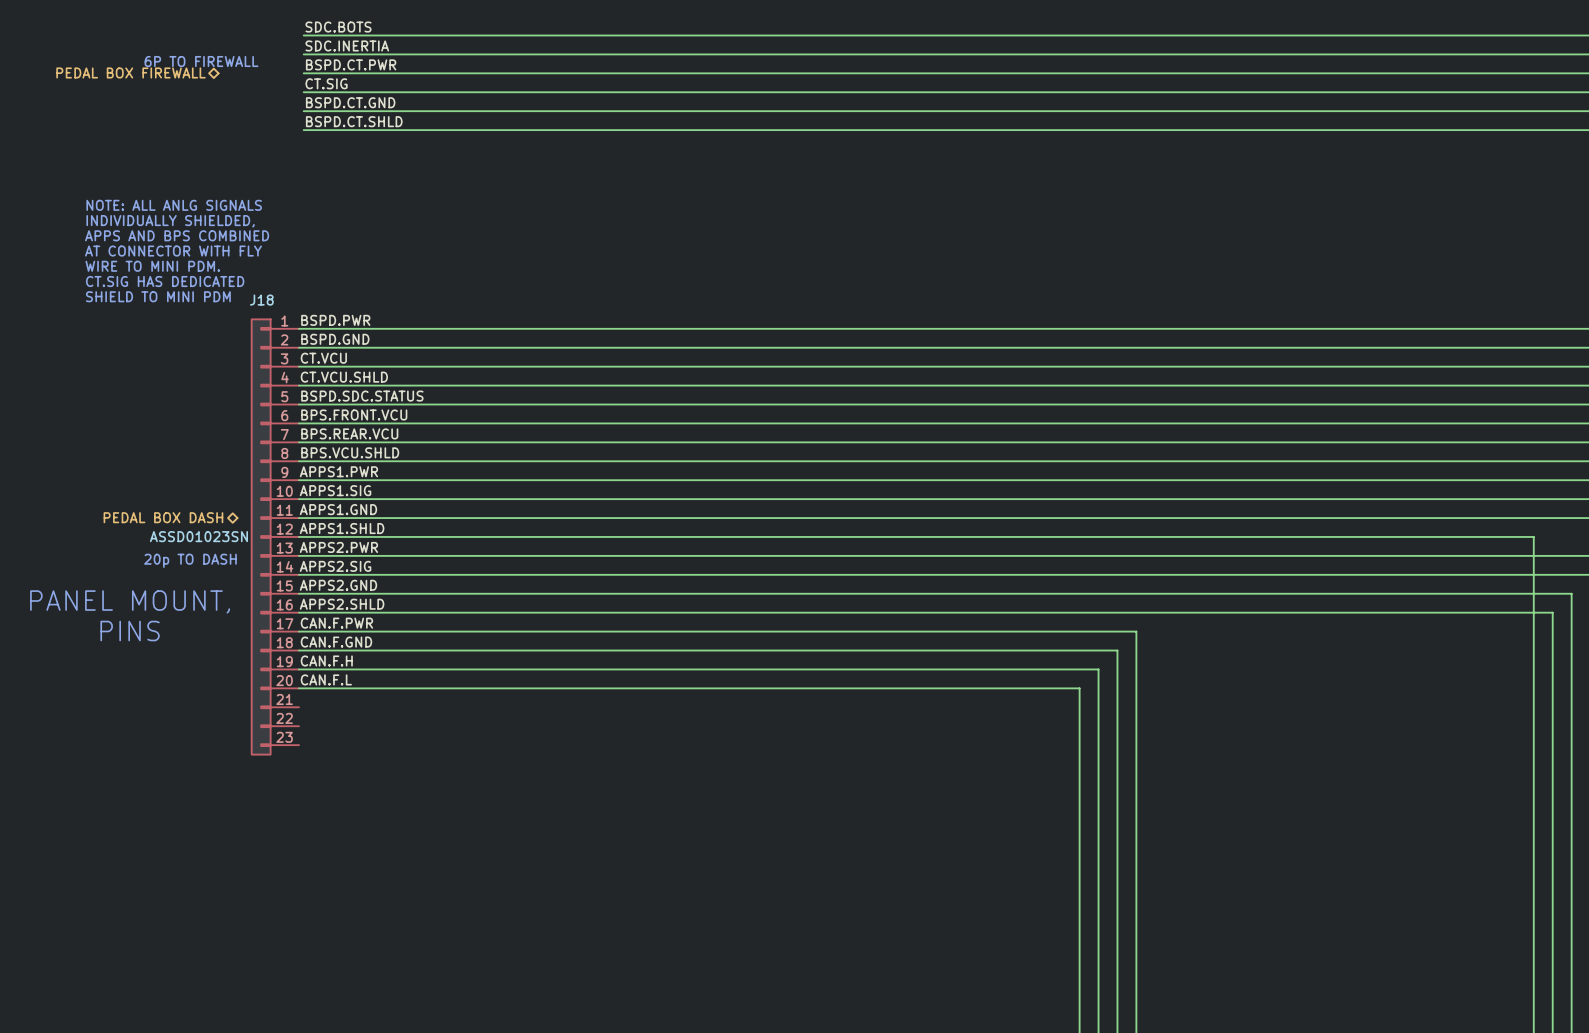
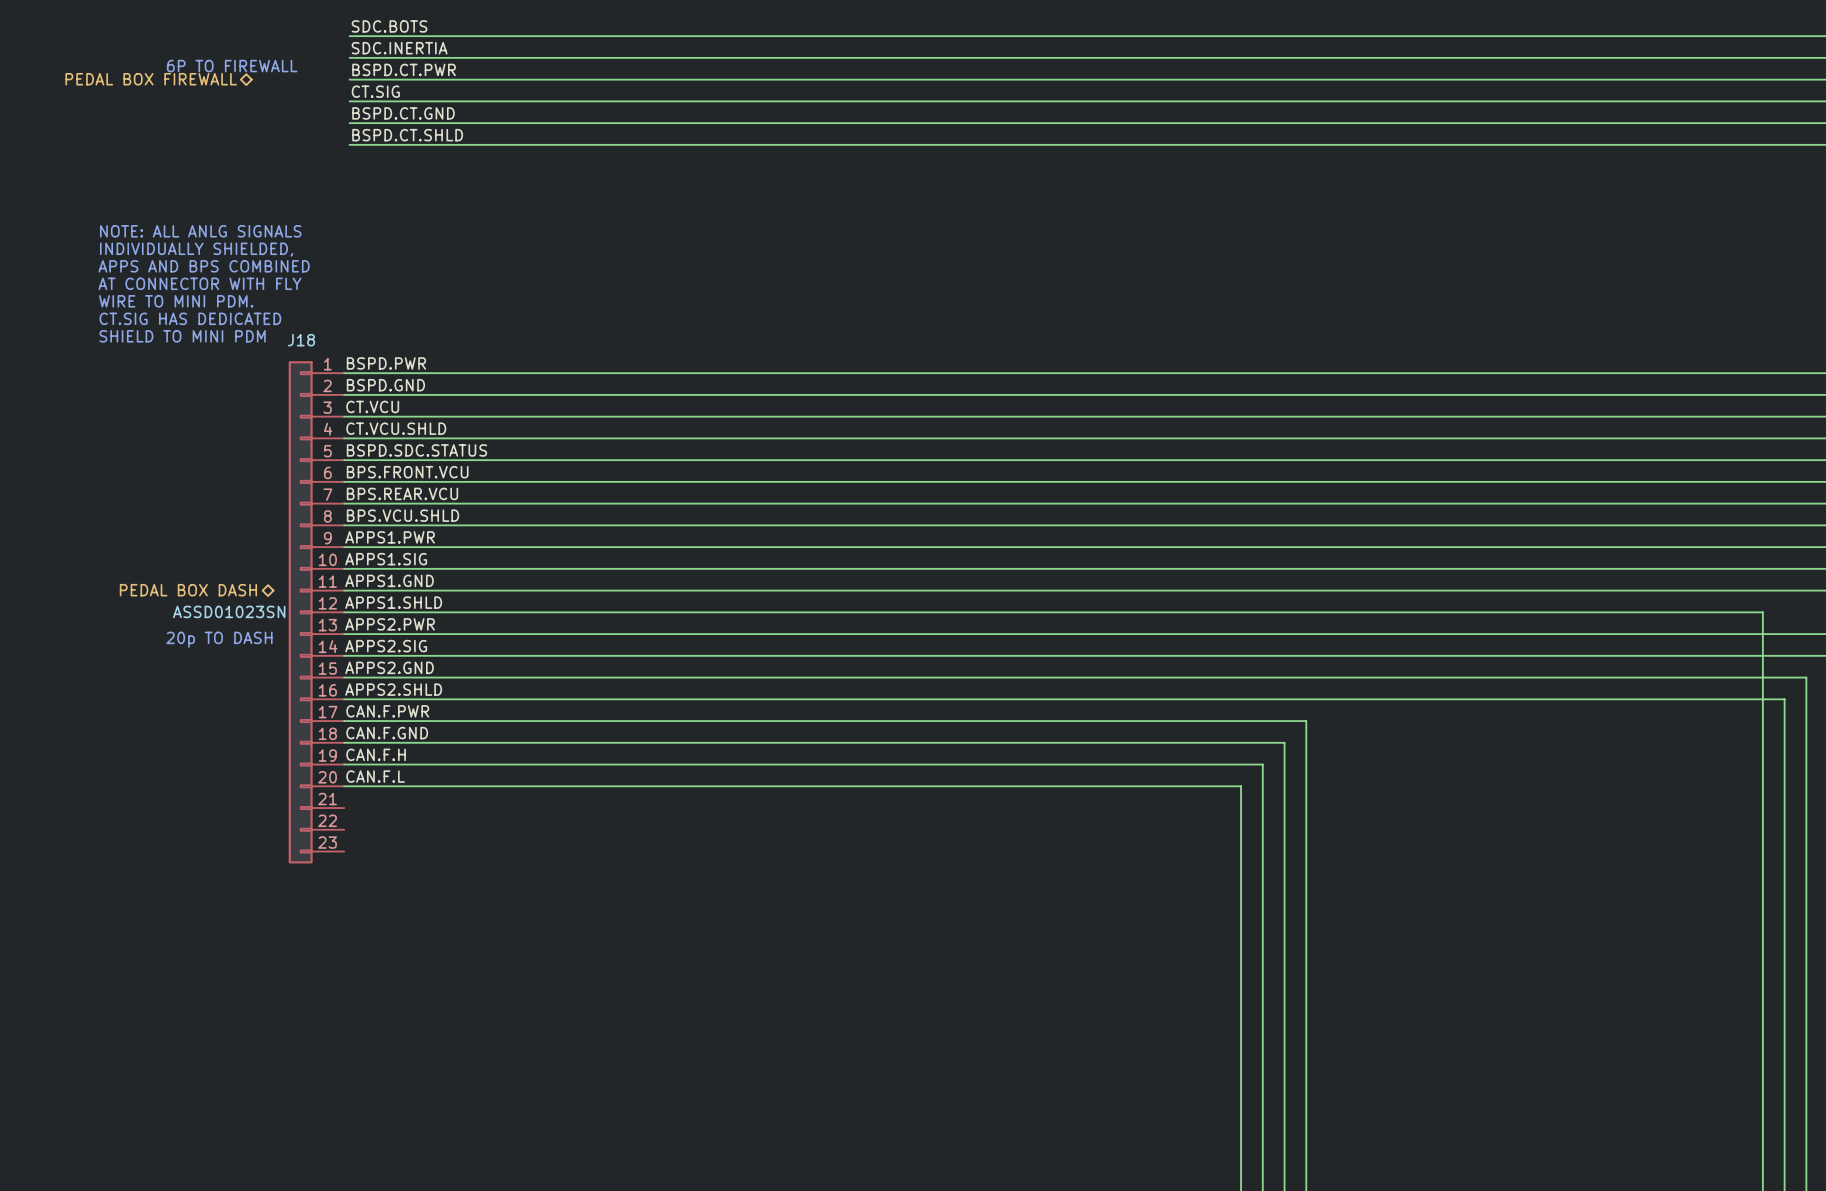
text: PANEL MOUNT, (130, 601) -> none
text: PINS (130, 631) -> none

